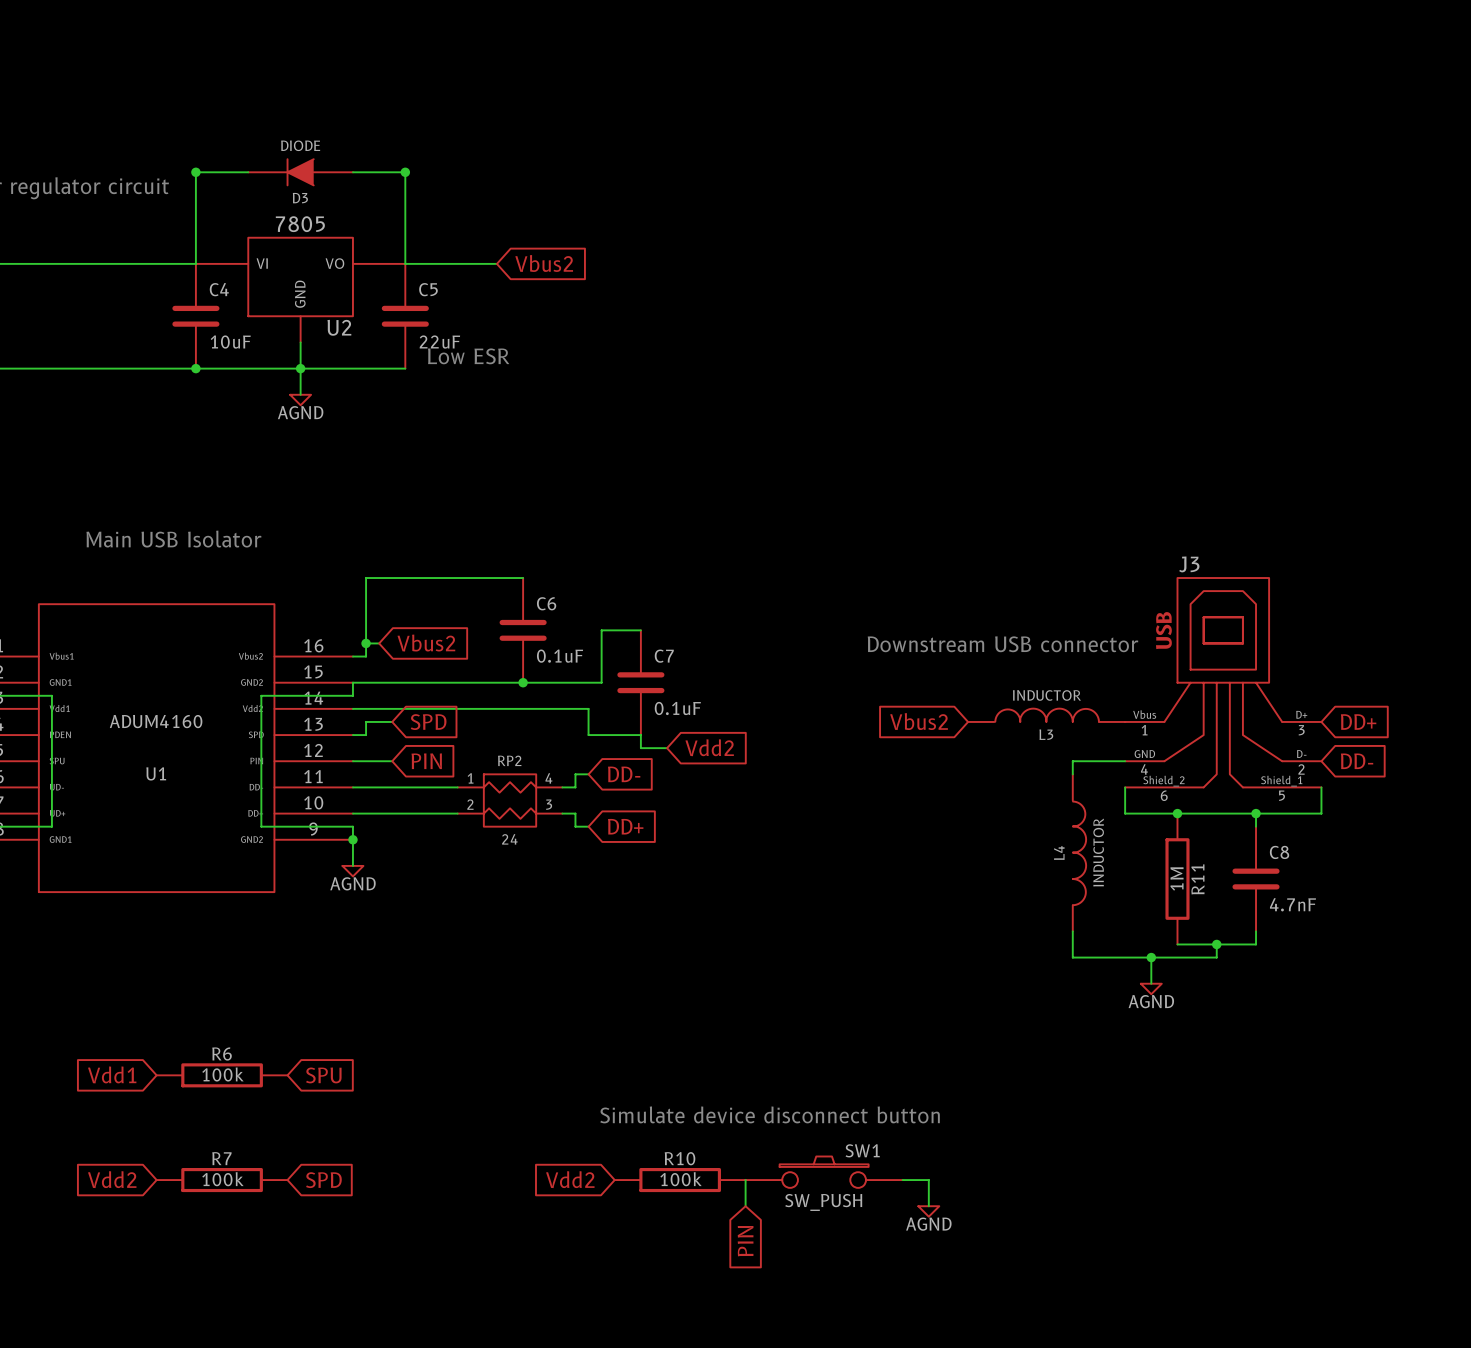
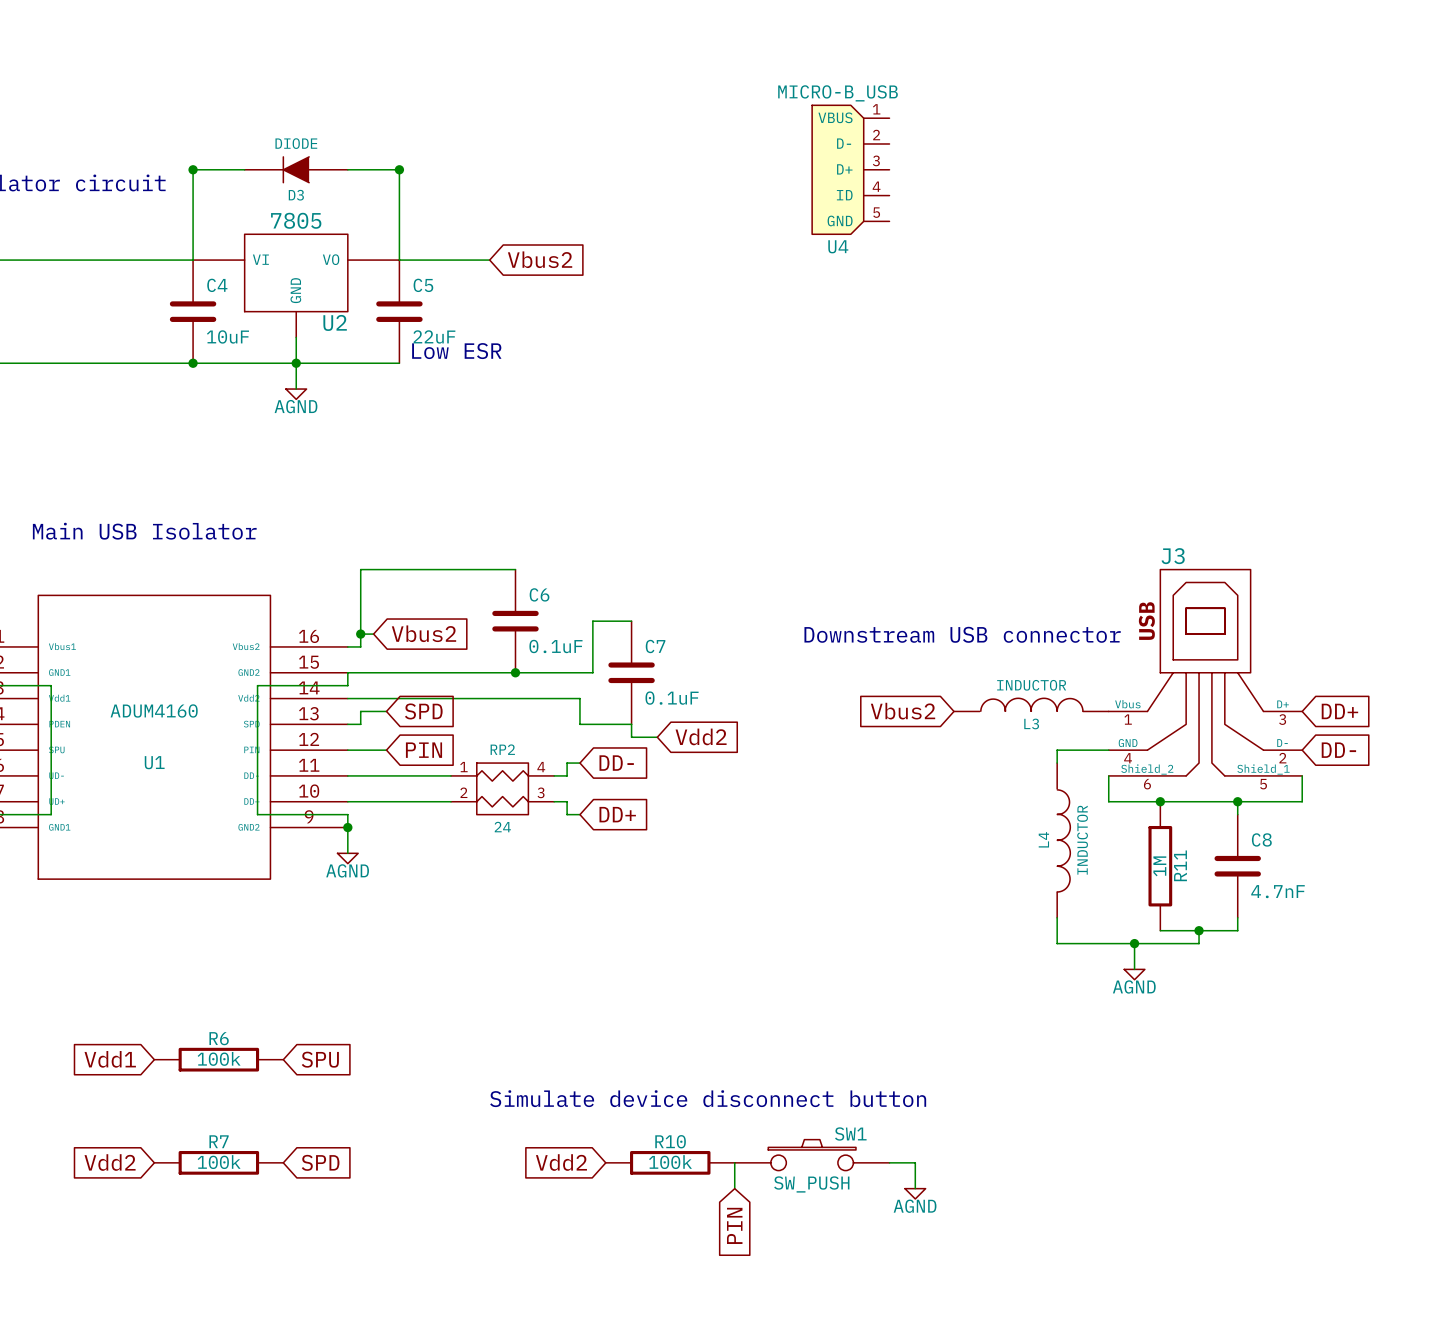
U4: none -> MICRO-B_USB (850, 169)

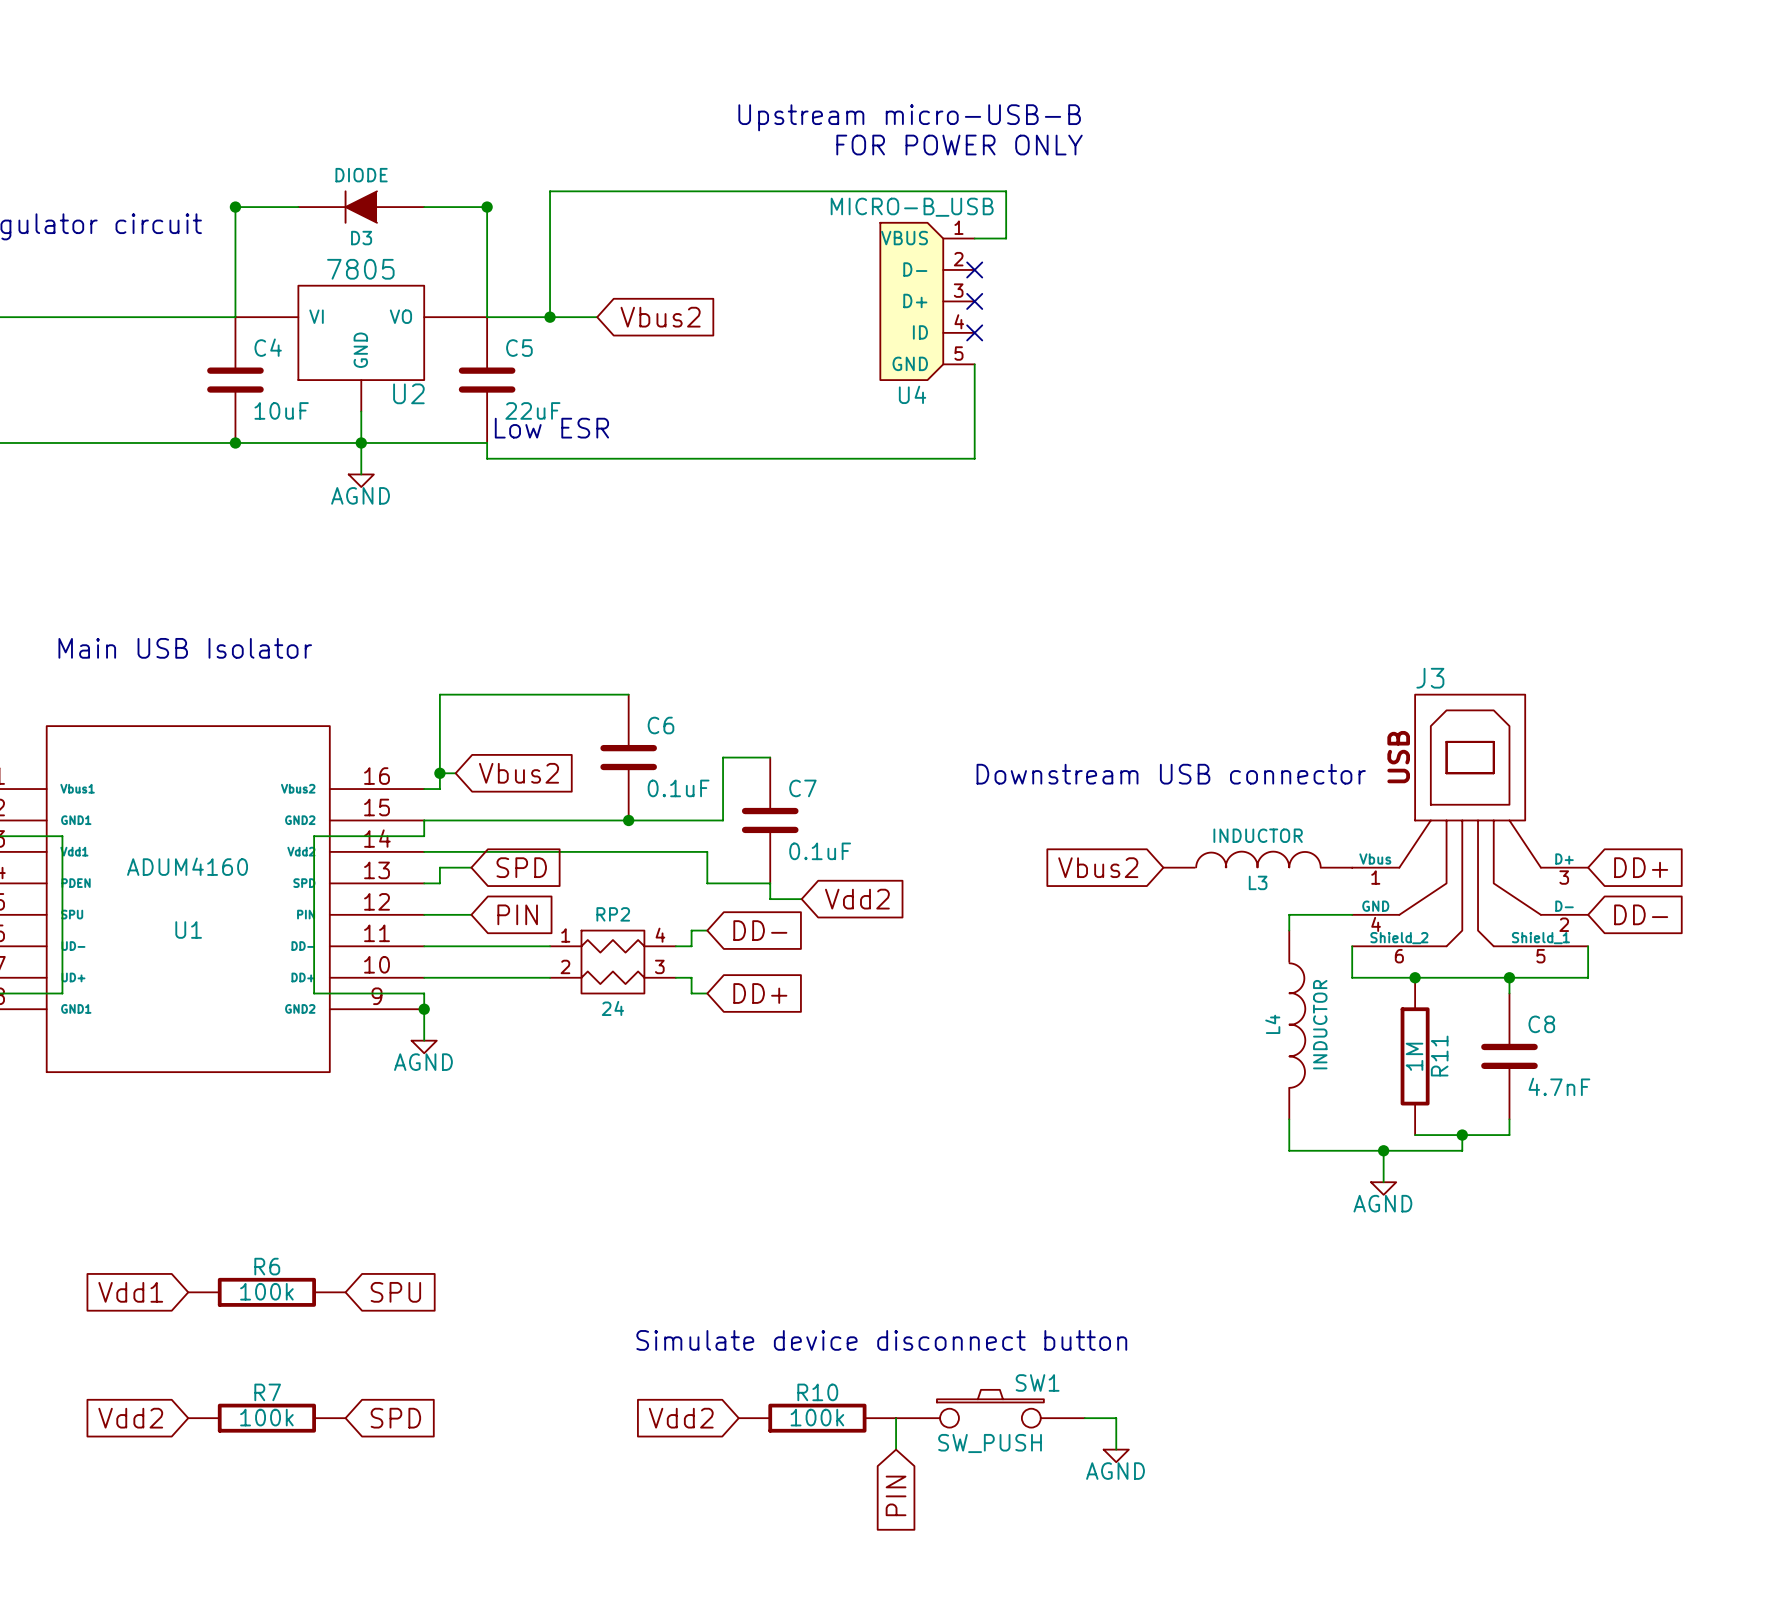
text: none -> Upstream micro-USB-B (909, 117)
text: none -> FOR POWER ONLY (959, 145)
U4 position: (850, 169) -> (927, 301)
wire: none -> (974, 238) (1006, 238) (1006, 191) (550, 191) (550, 317)
no-connect mark: none -> (974, 269)
no-connect mark: none -> (974, 301)
junction: none -> (550, 317)
no-connect mark: none -> (974, 332)
wire: none -> (974, 364) (974, 458) (487, 458) (487, 442)

